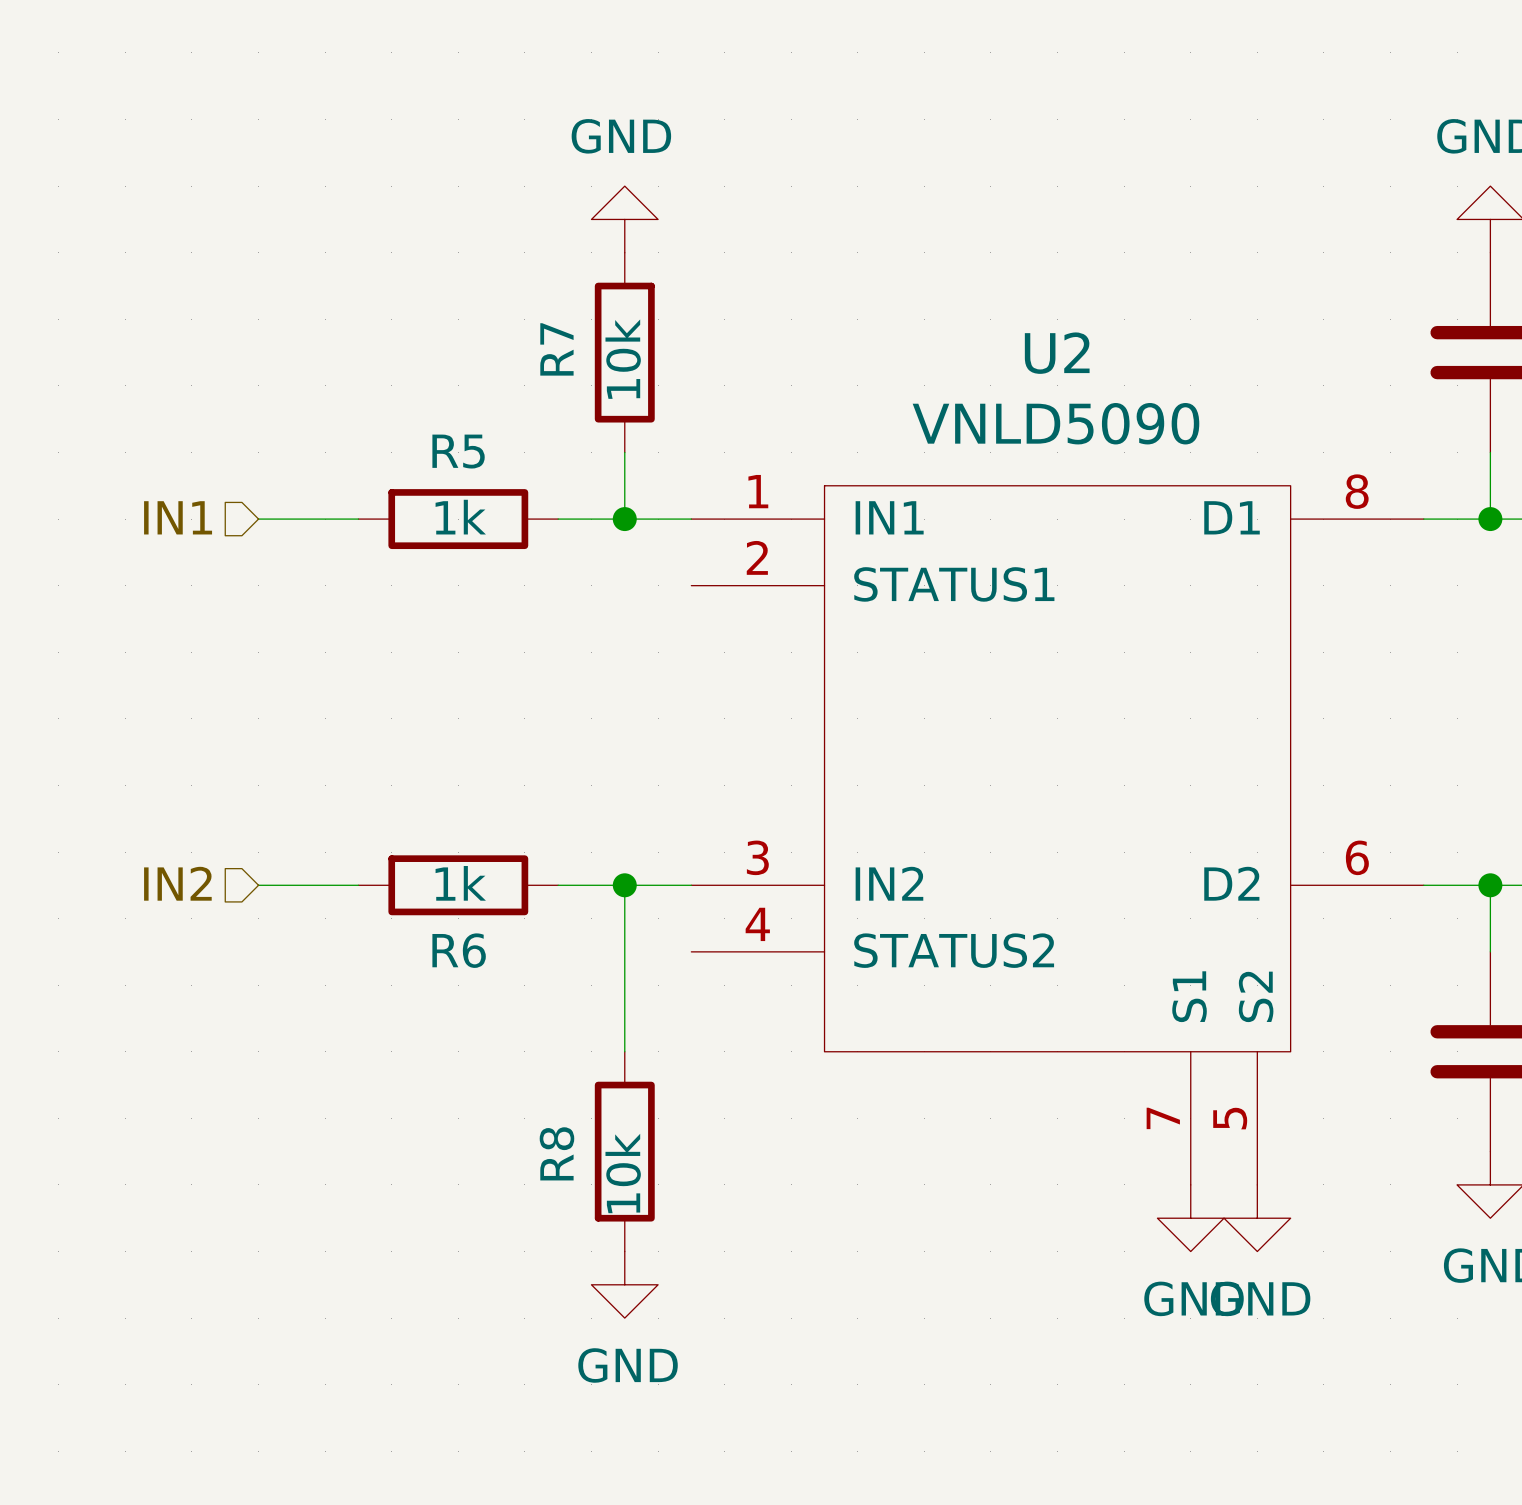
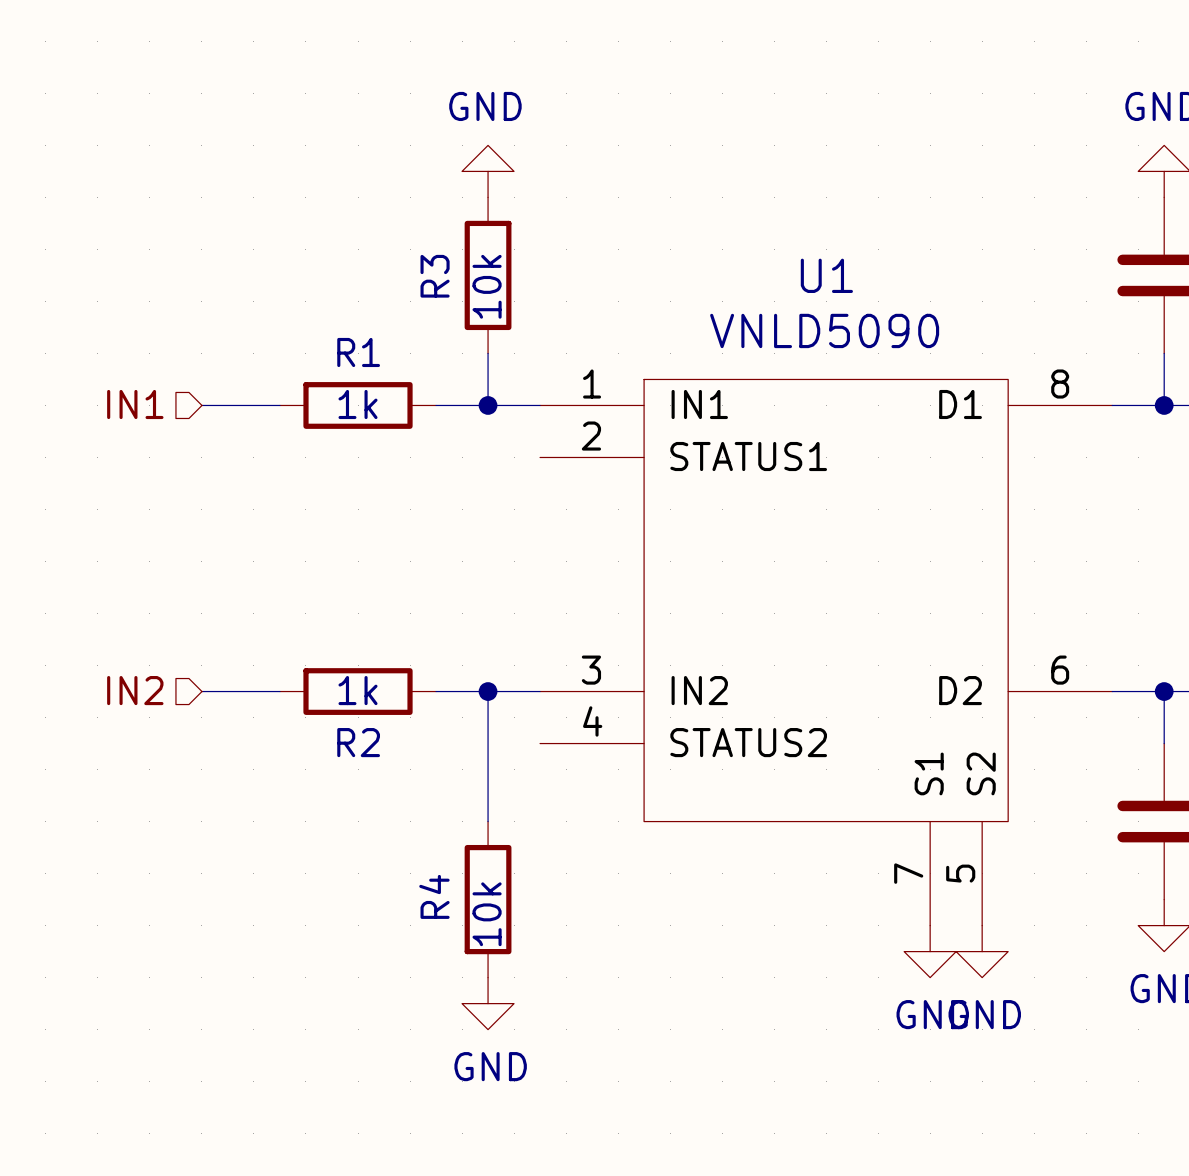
R7 name: R7 (556, 349) -> R3 (435, 276)
U2 name: U2 (1057, 353) -> U1 (826, 275)
R5 name: R5 (458, 451) -> R1 (358, 352)
R6 name: R6 (459, 950) -> R2 (358, 742)
R8 name: R8 (556, 1153) -> R4 (434, 896)

